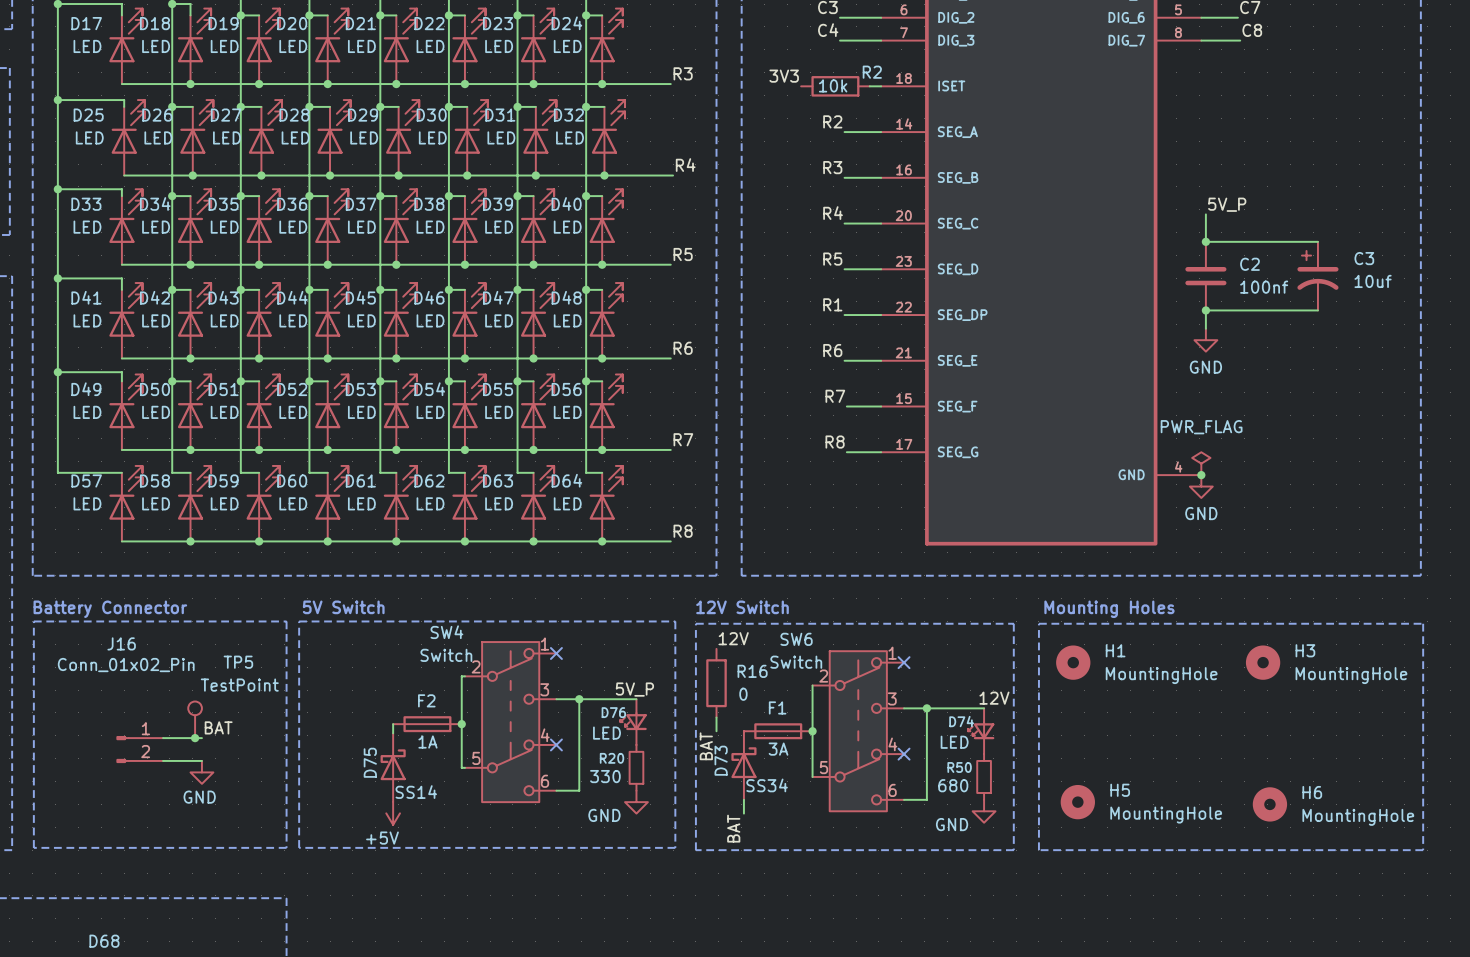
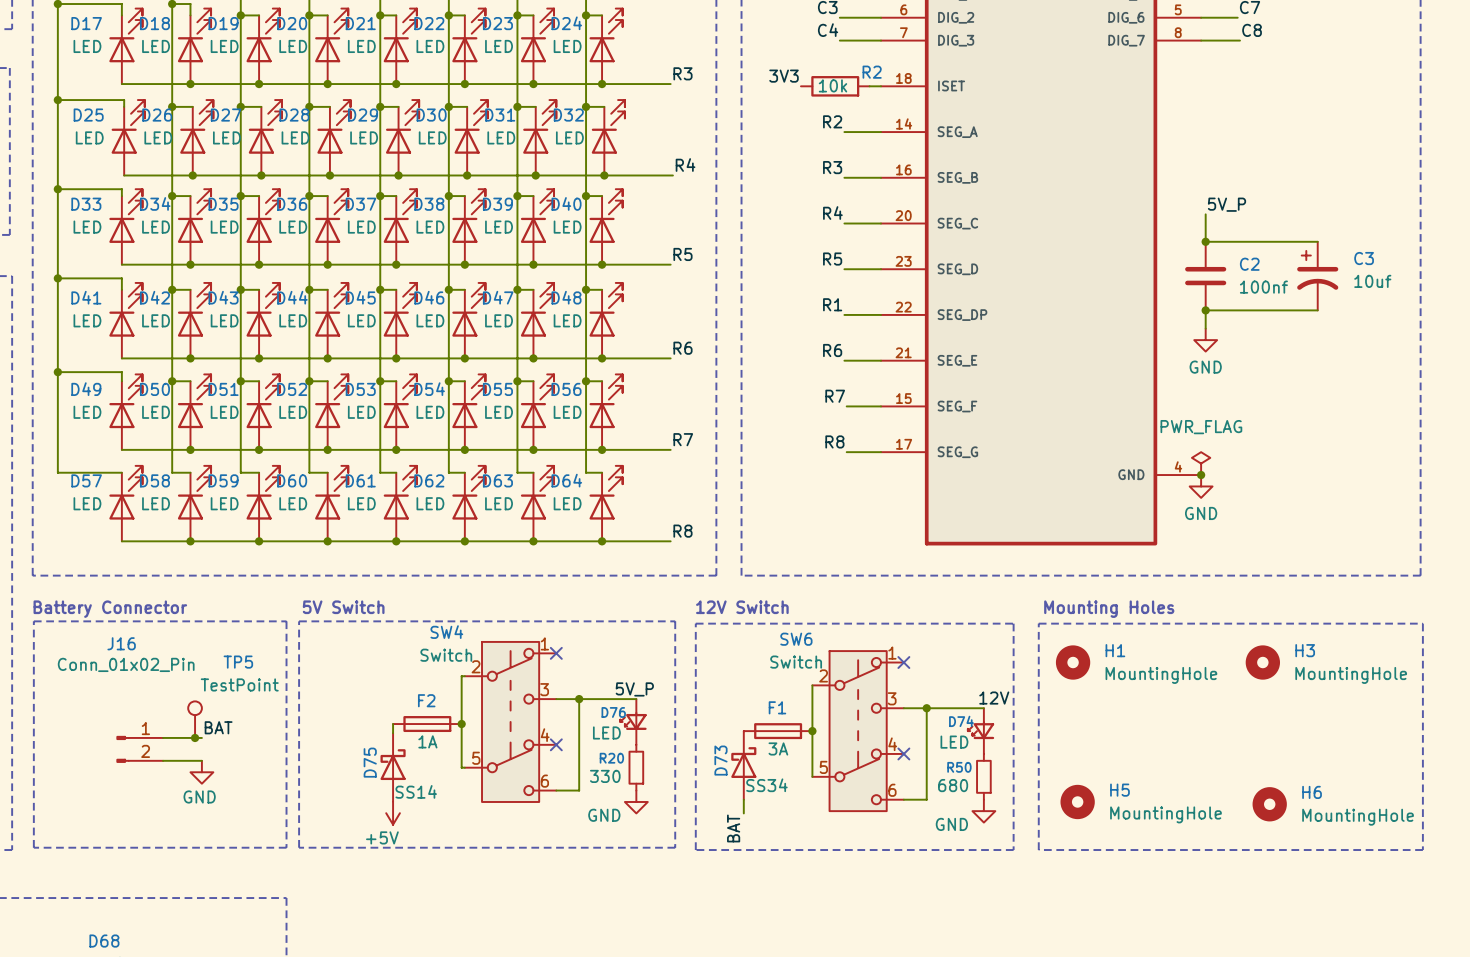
label: 12V (733, 638) -> none
R16: 0 (716, 683) -> none
wire: (716, 717) (716, 731) -> none
label: BAT (706, 746) -> none

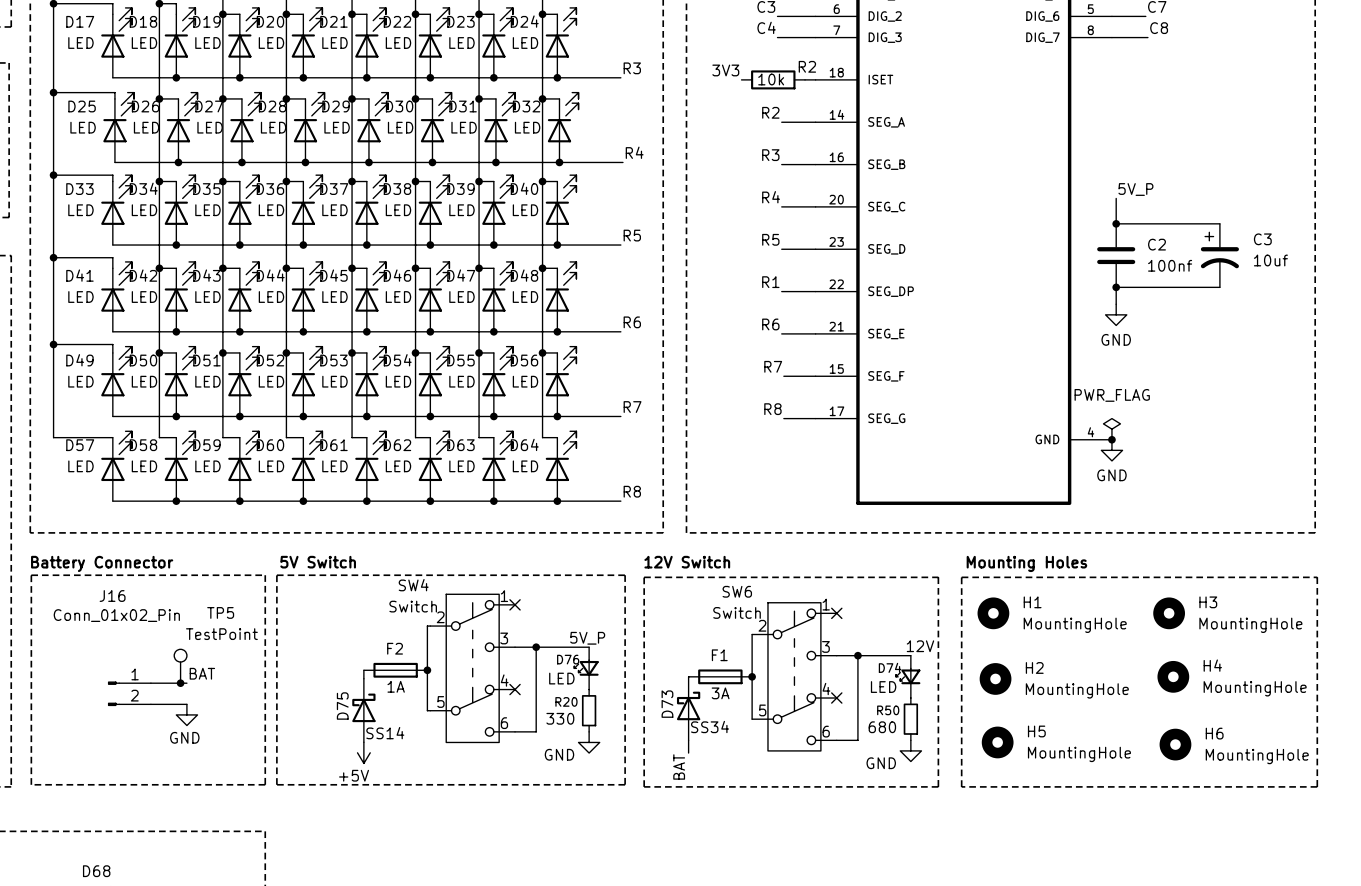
H4: none -> MountingHole (1173, 676)
H2: none -> MountingHole (995, 678)

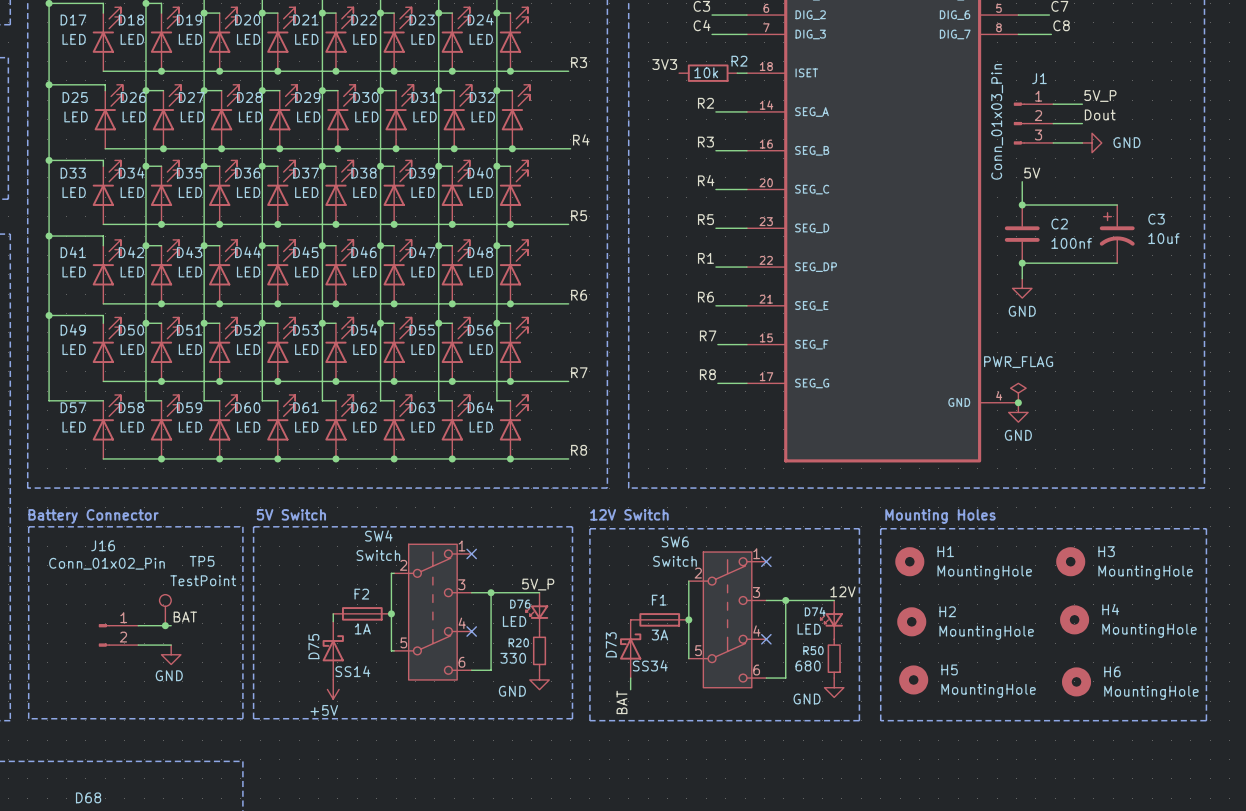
label: none -> 5V_P (1100, 96)
wire: none -> (1053, 104) (1082, 104)
label: none -> Dout (1100, 114)
J1: none -> Conn_01x03_Pin (1033, 123)
wire: none -> (1053, 123) (1082, 123)
wire: none -> (1053, 142) (1082, 142)
power symbol: none -> GND (1092, 142)
label: 5V_P (1135, 189) -> 5V (1032, 173)

